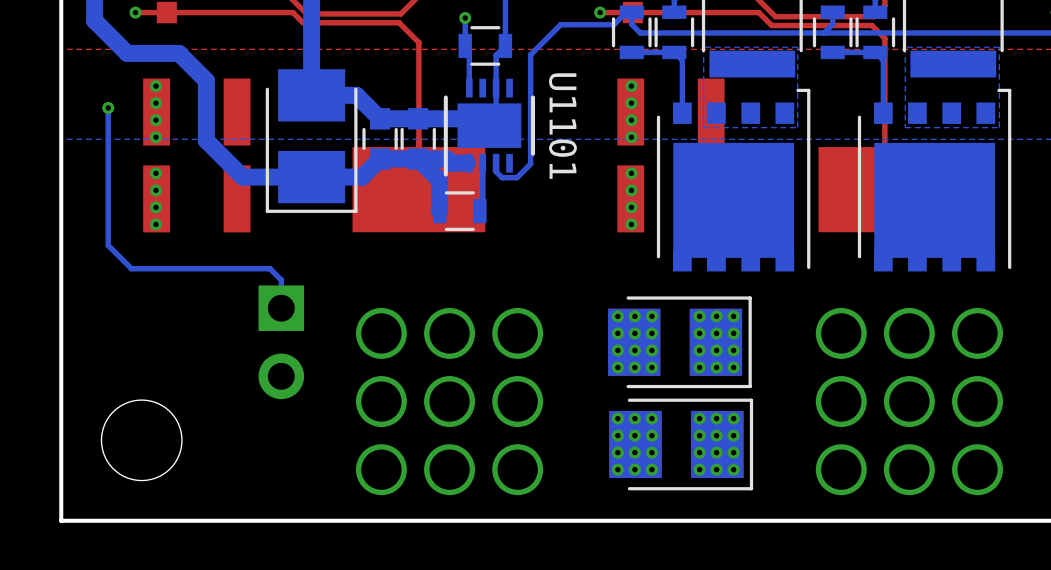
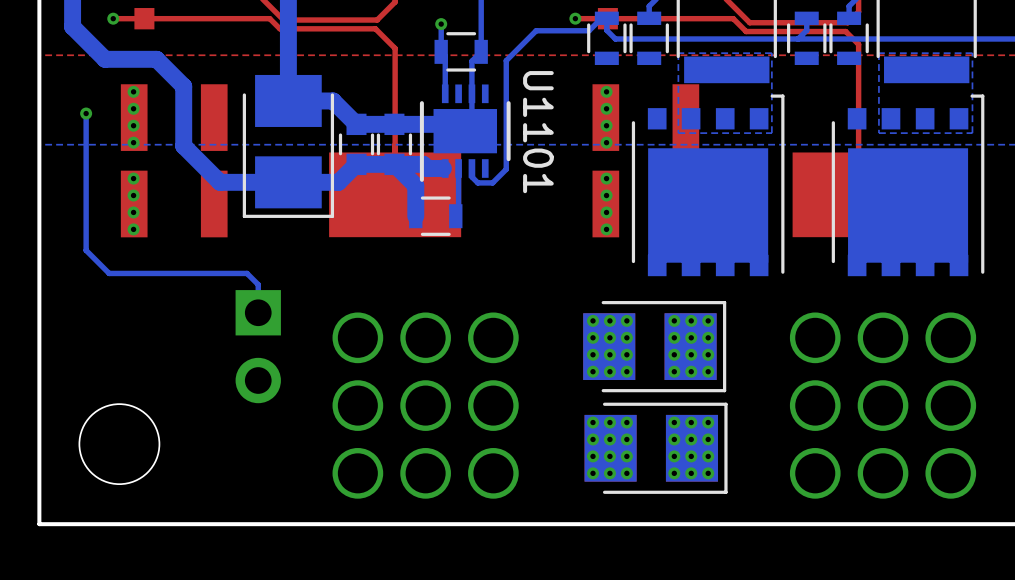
bottom track: (631, 52) (674, 52) (682, 60) (682, 113) -> none
bottom track: (832, 52) (875, 52) (883, 60) (883, 113) -> none

